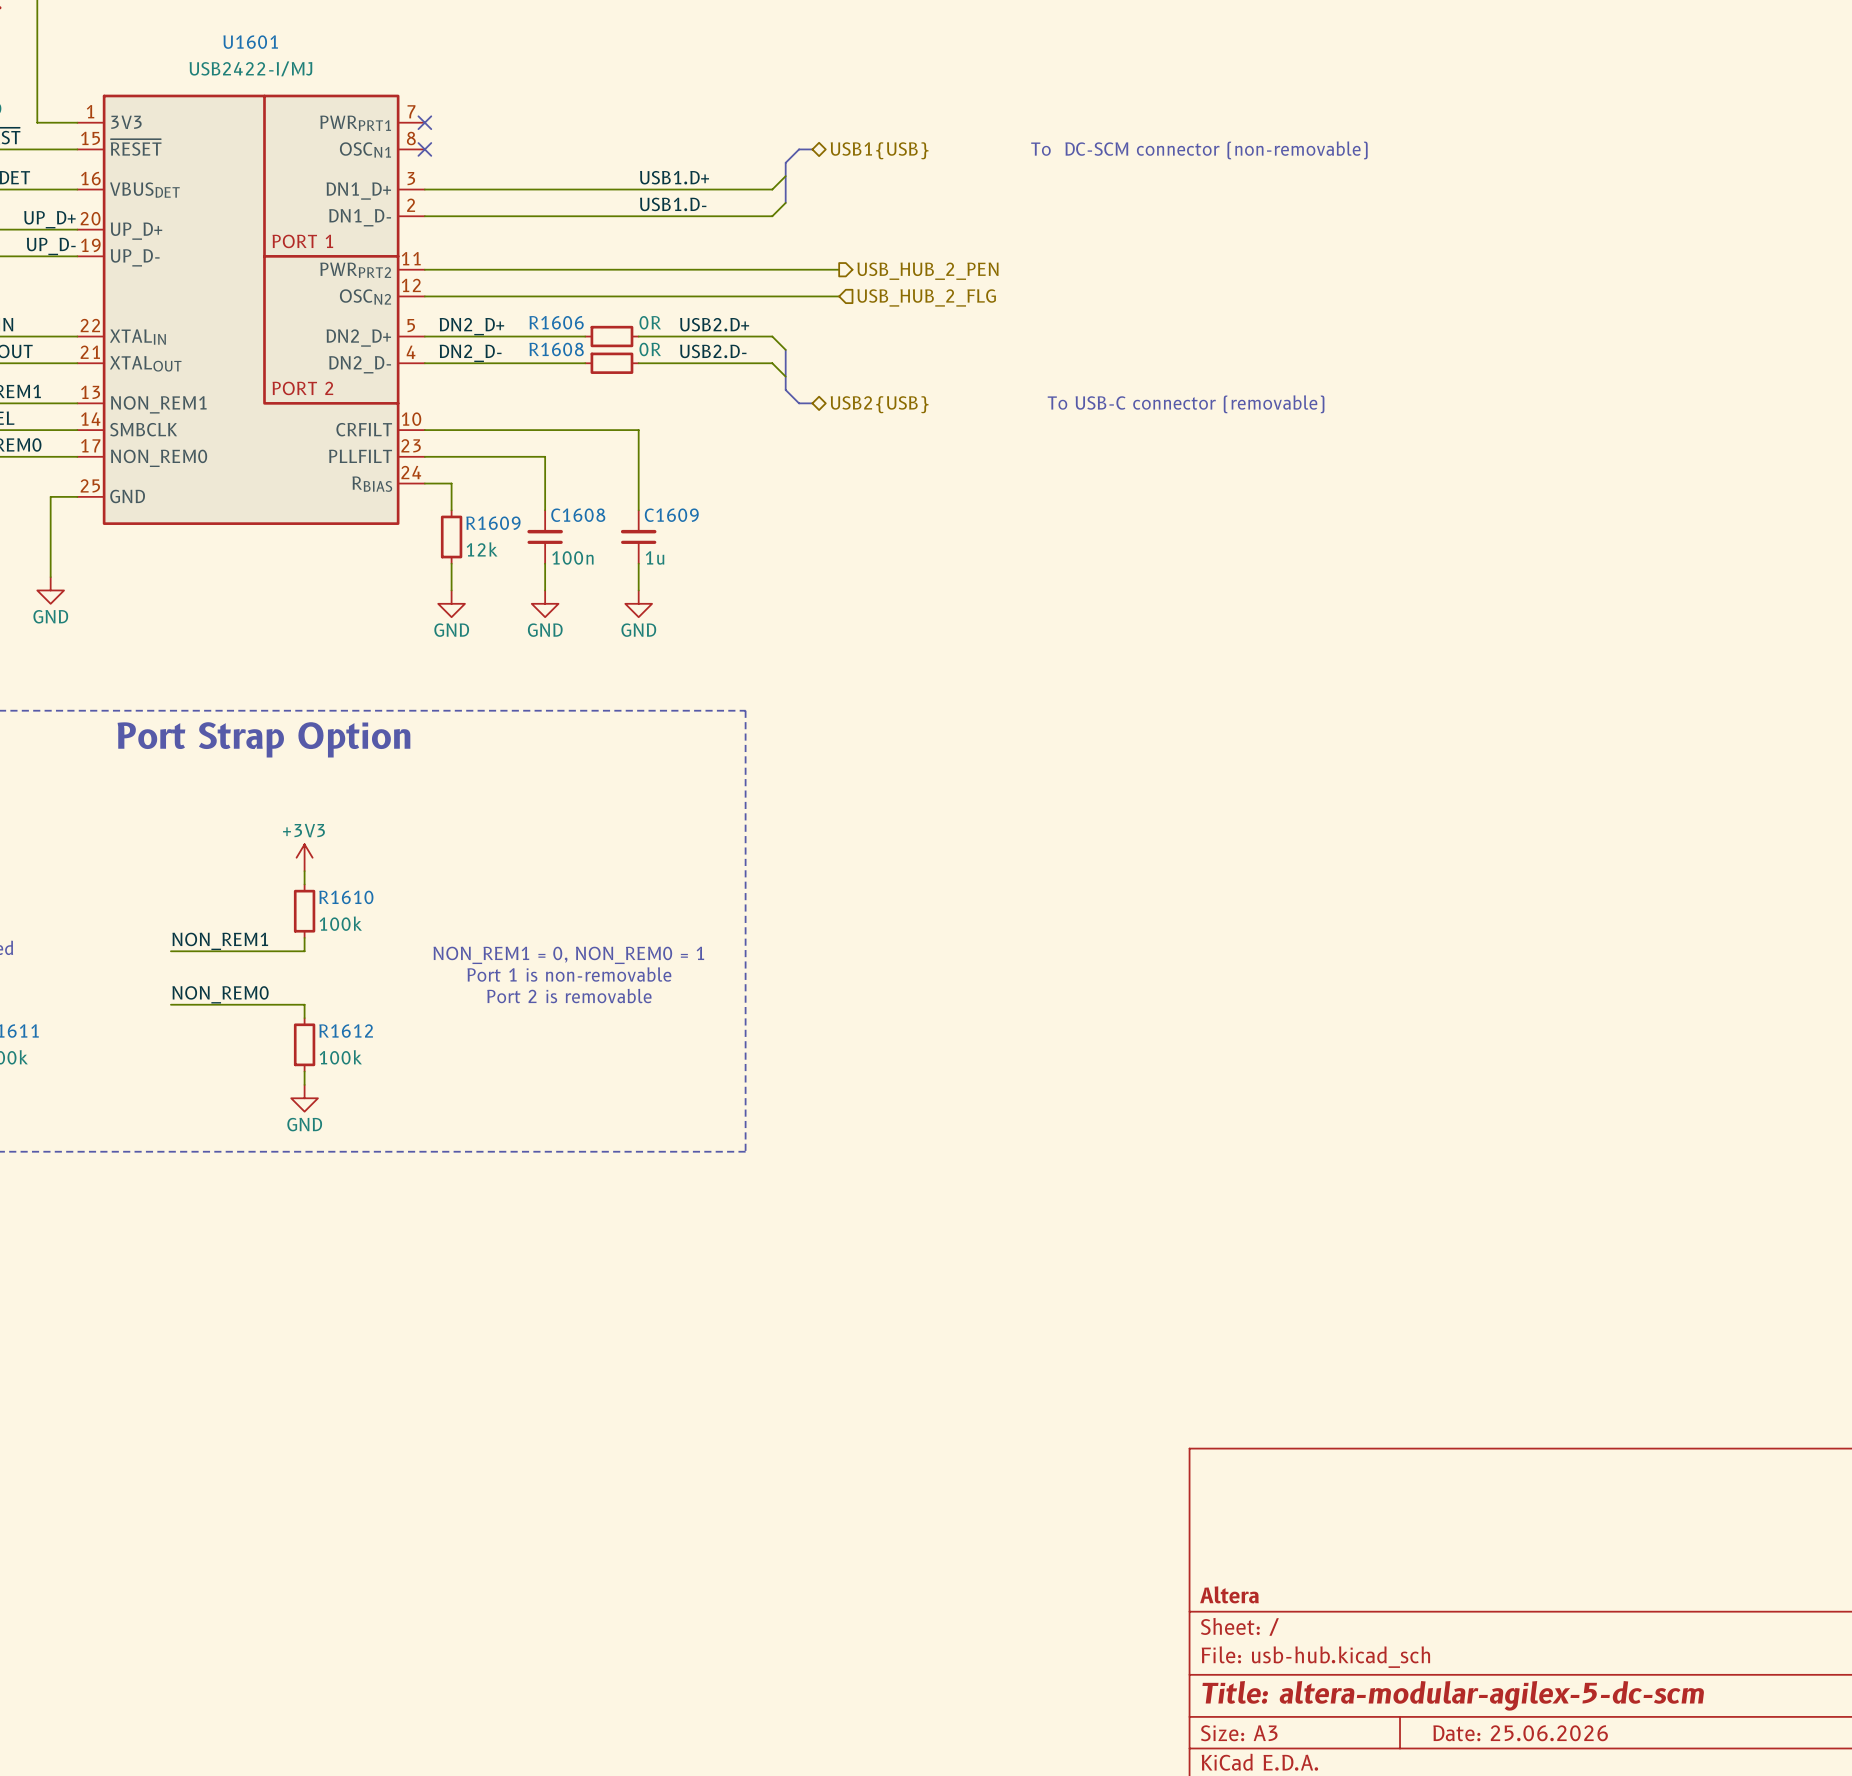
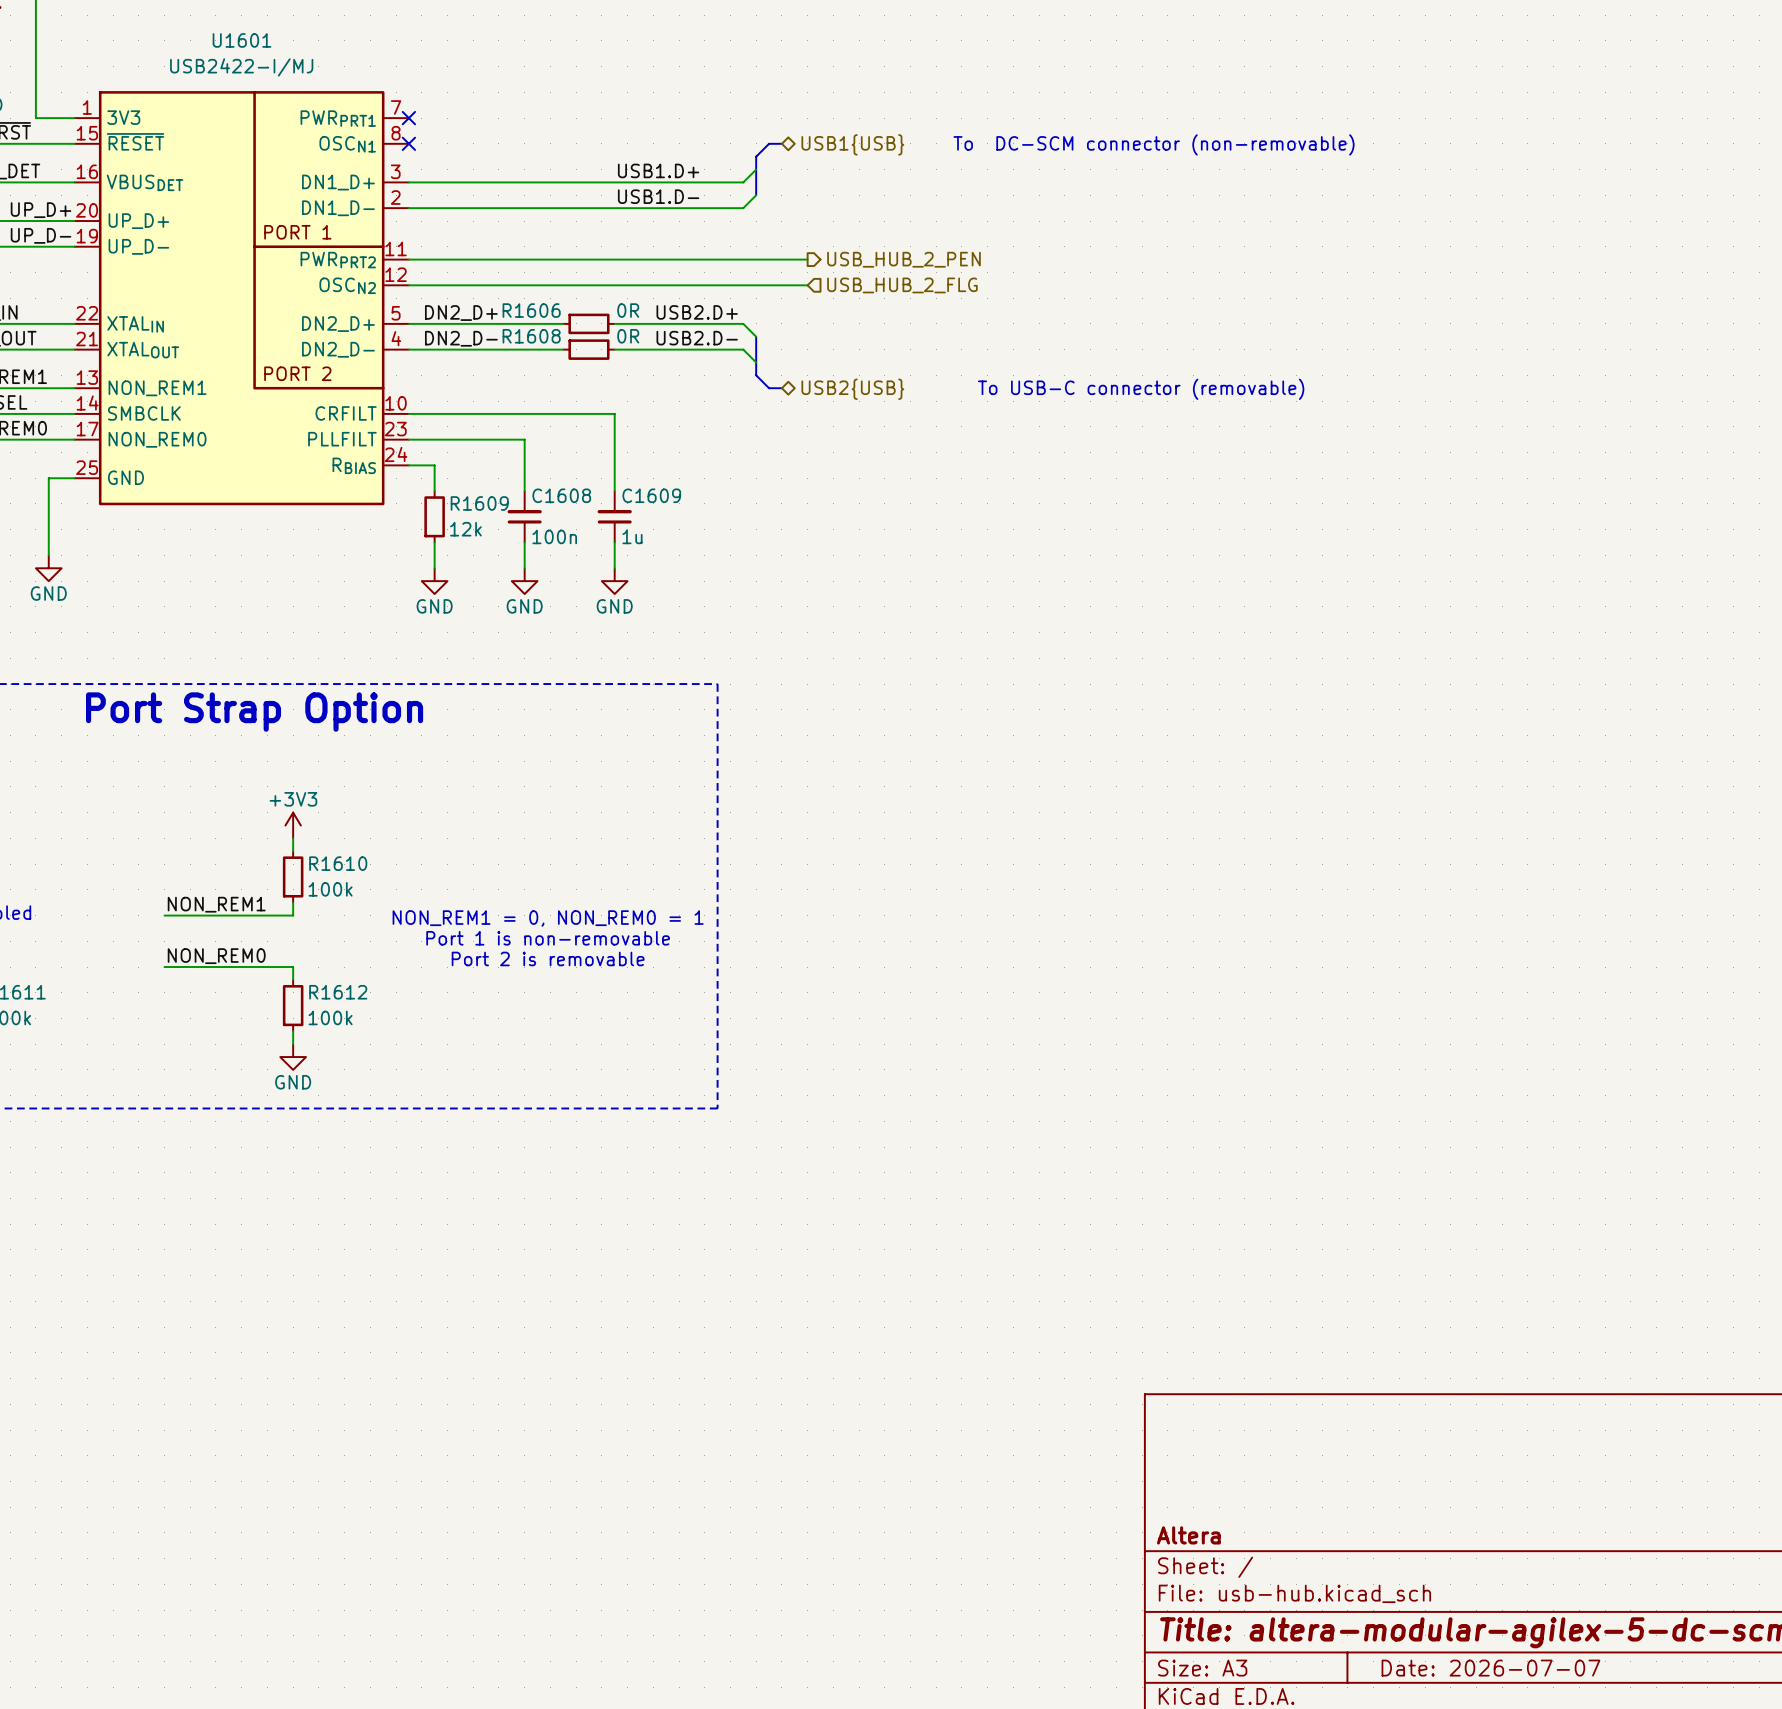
title block: Date: 25.06.2026 (1520, 1733) -> Date: 2026-07-07 (1490, 1668)

